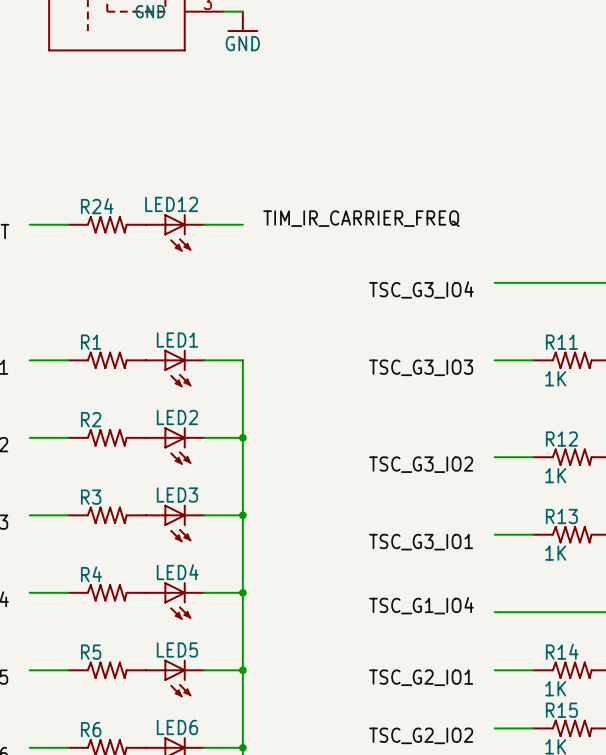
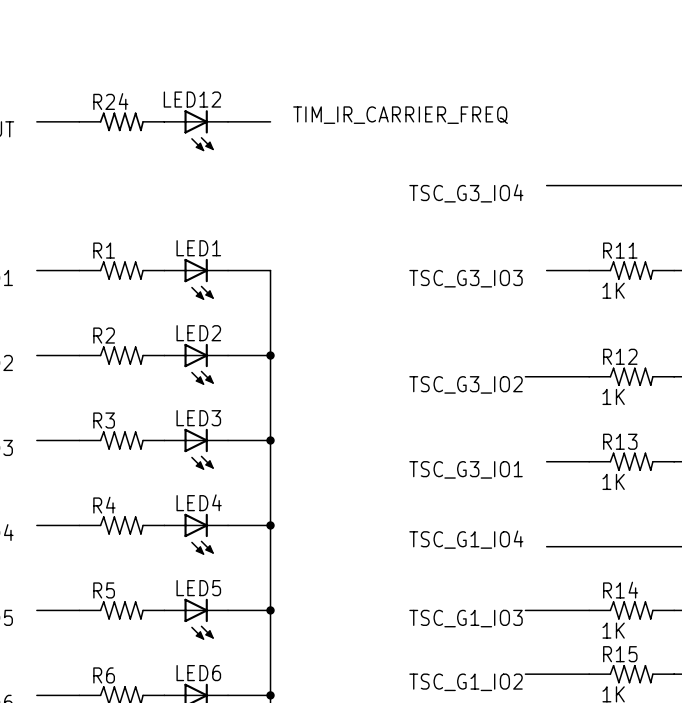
wire: none -> (525, 376) (546, 376)
wire: none -> (525, 610) (546, 610)
label: TSC_G2_IO1 (421, 677) -> TSC_G1_IO3 (466, 618)
wire: none -> (525, 674) (546, 674)
label: TSC_G2_IO2 (421, 735) -> TSC_G1_IO2 (466, 682)

